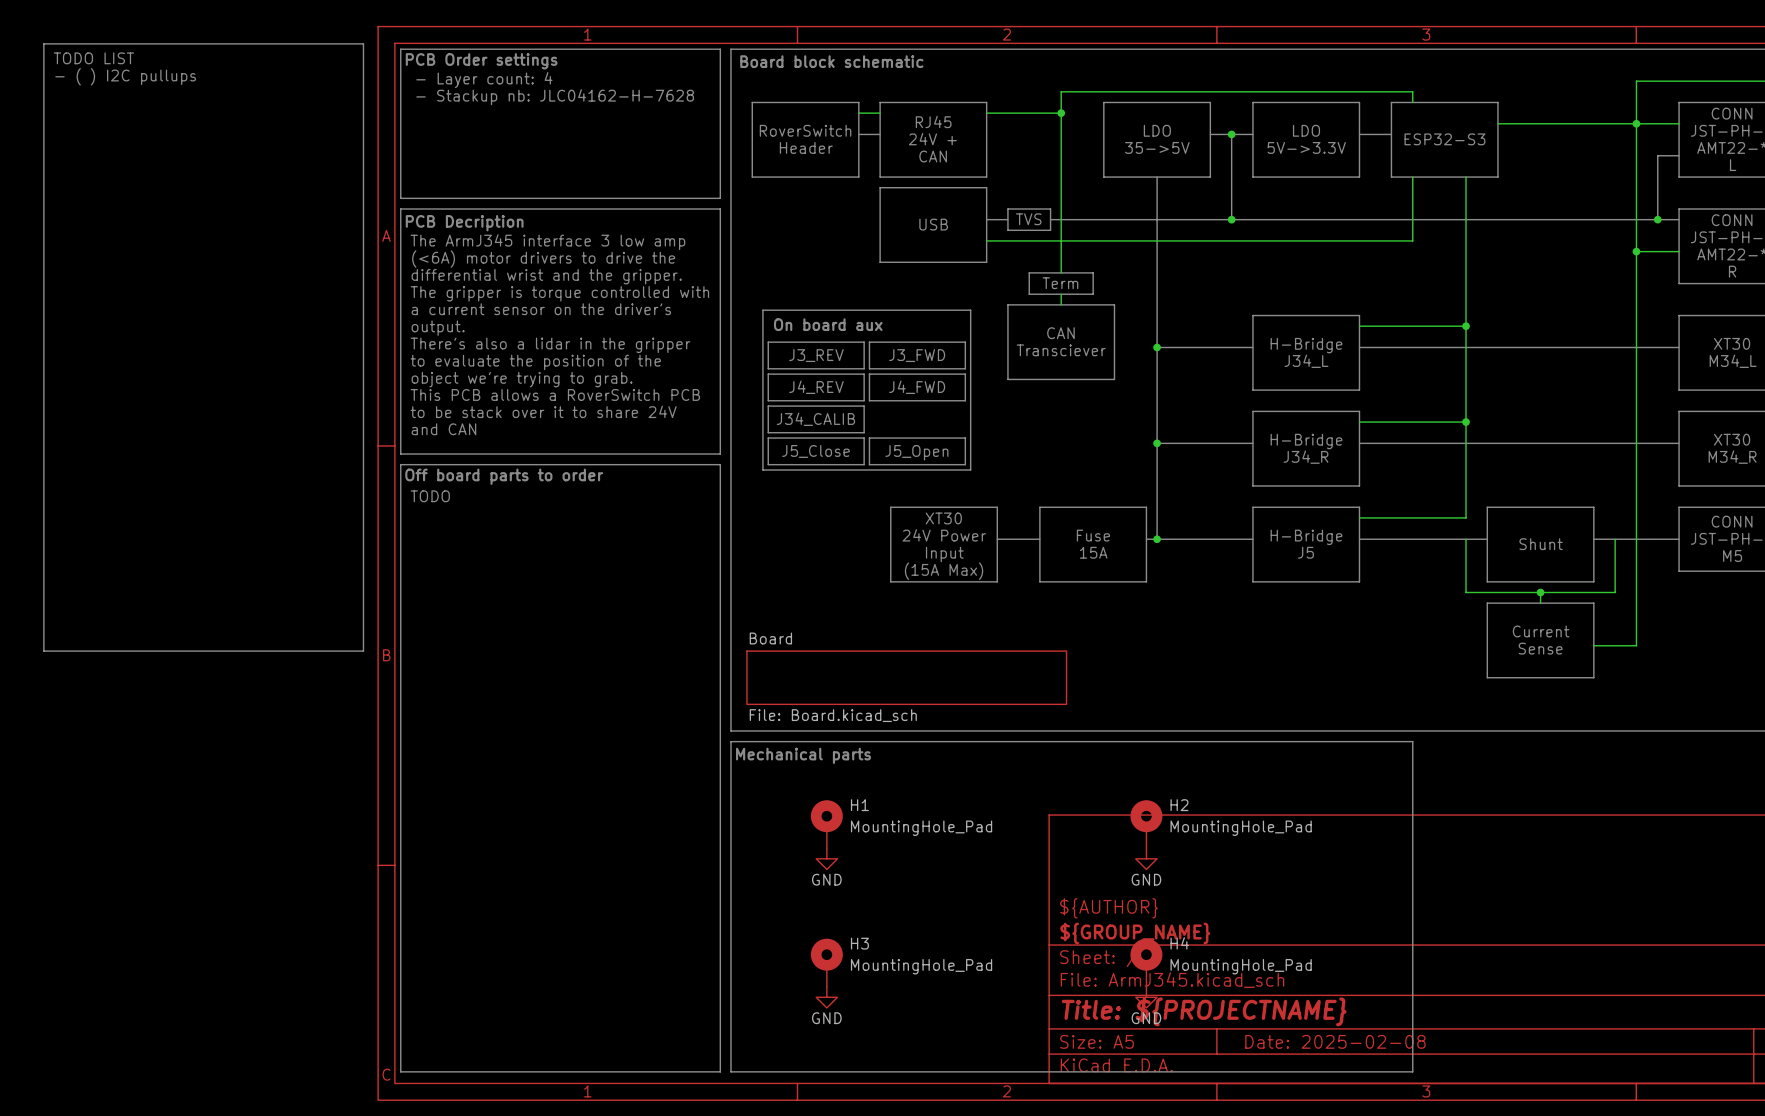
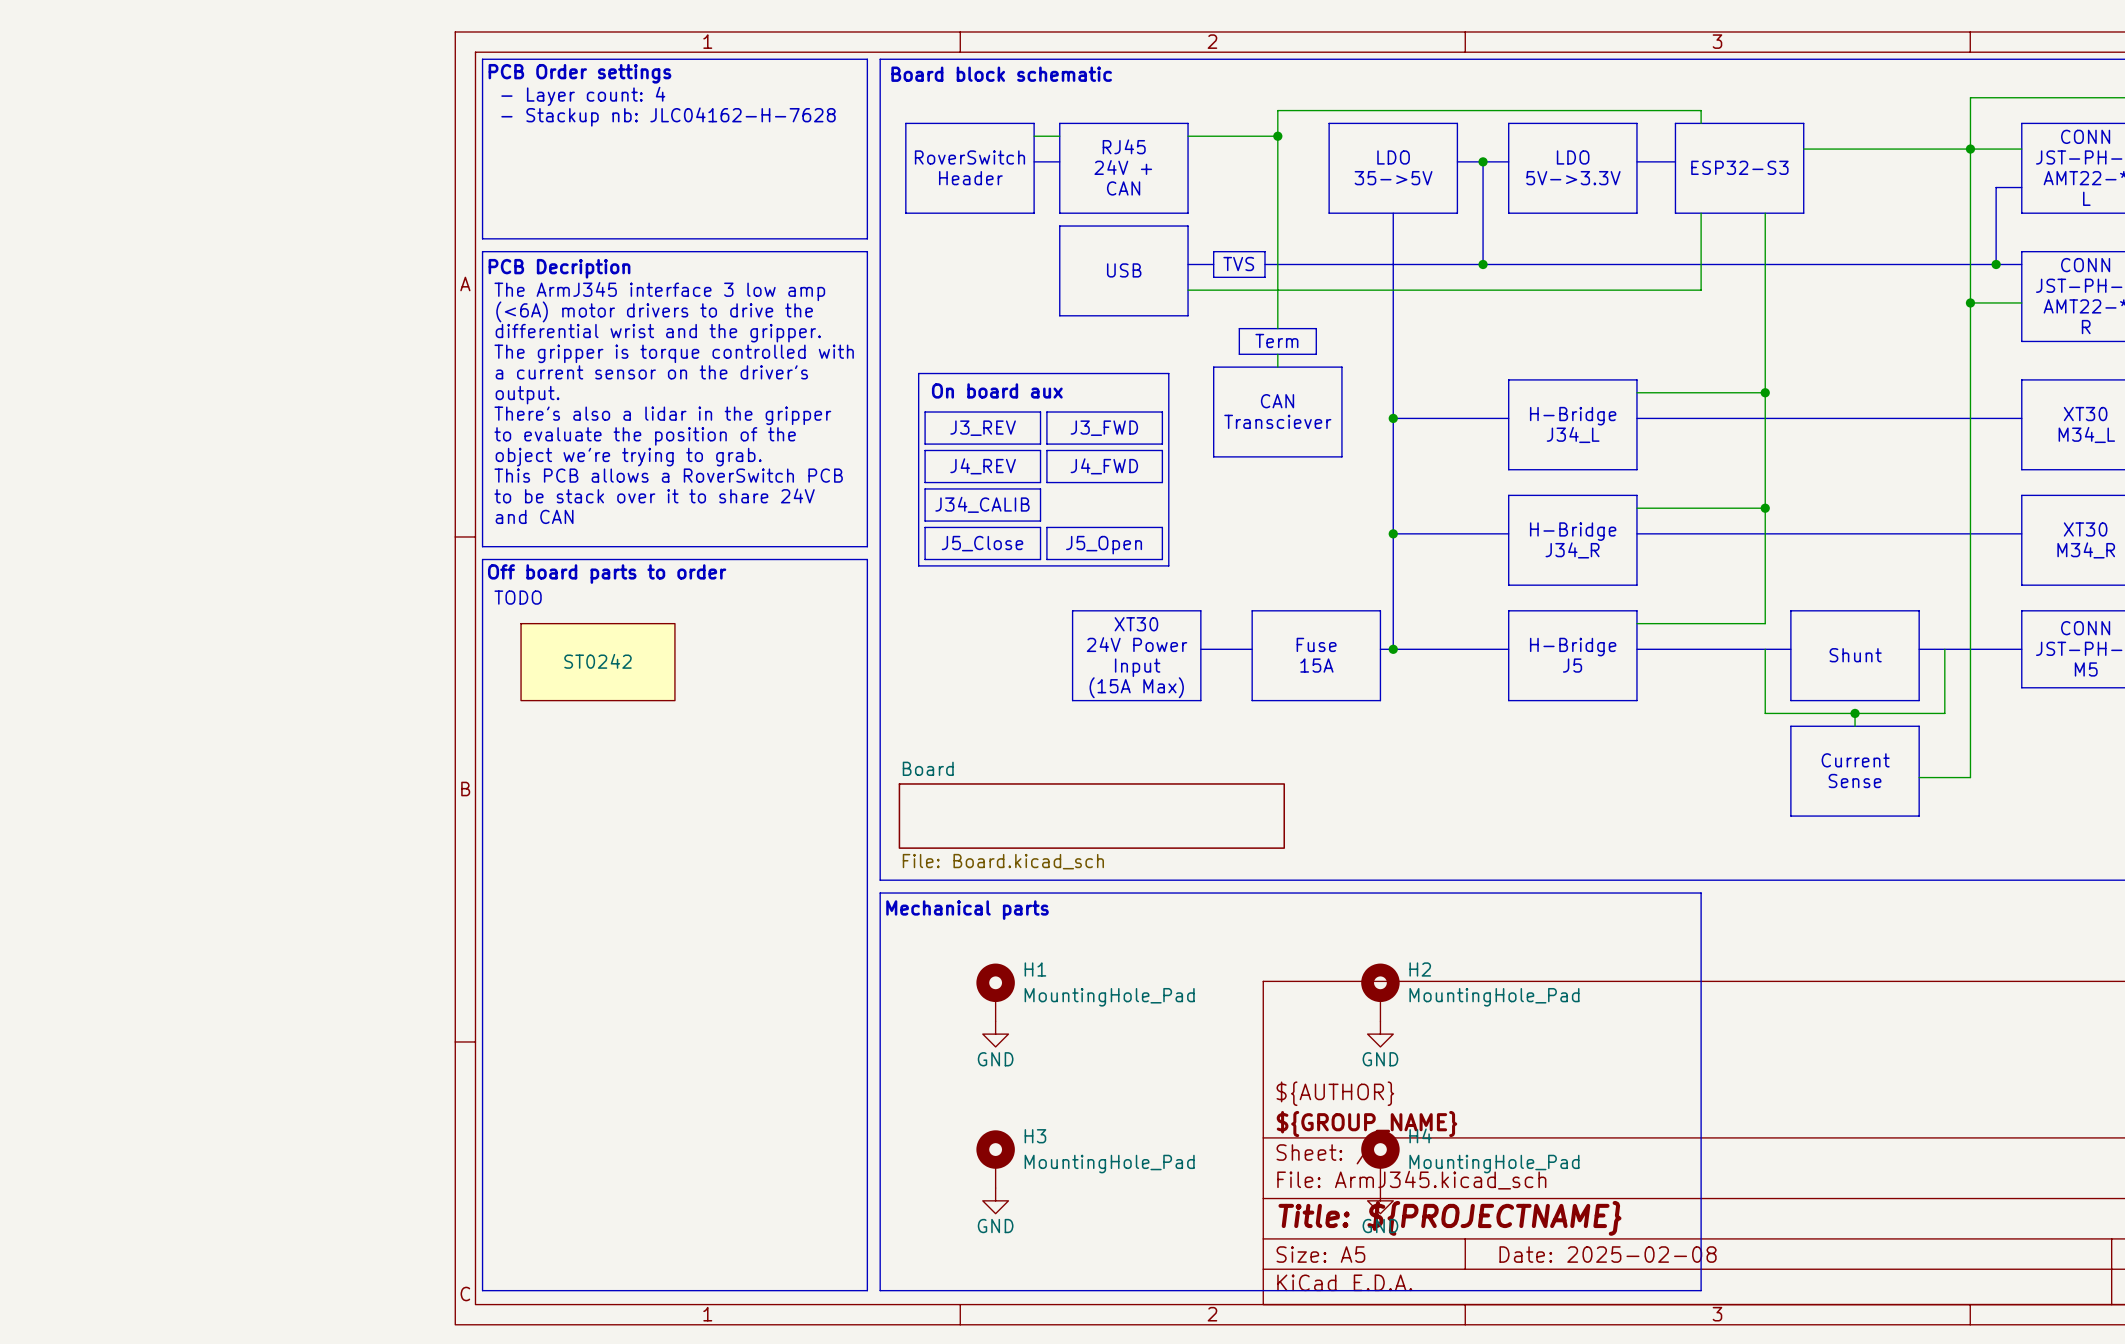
line: (43, 43) (363, 43) (363, 651) (43, 651) (43, 43) -> none
text: TODO LIST (93, 58) -> none
text: - ( ) I2C pullups (125, 76) -> none
part: none -> ST0242 (597, 662)

